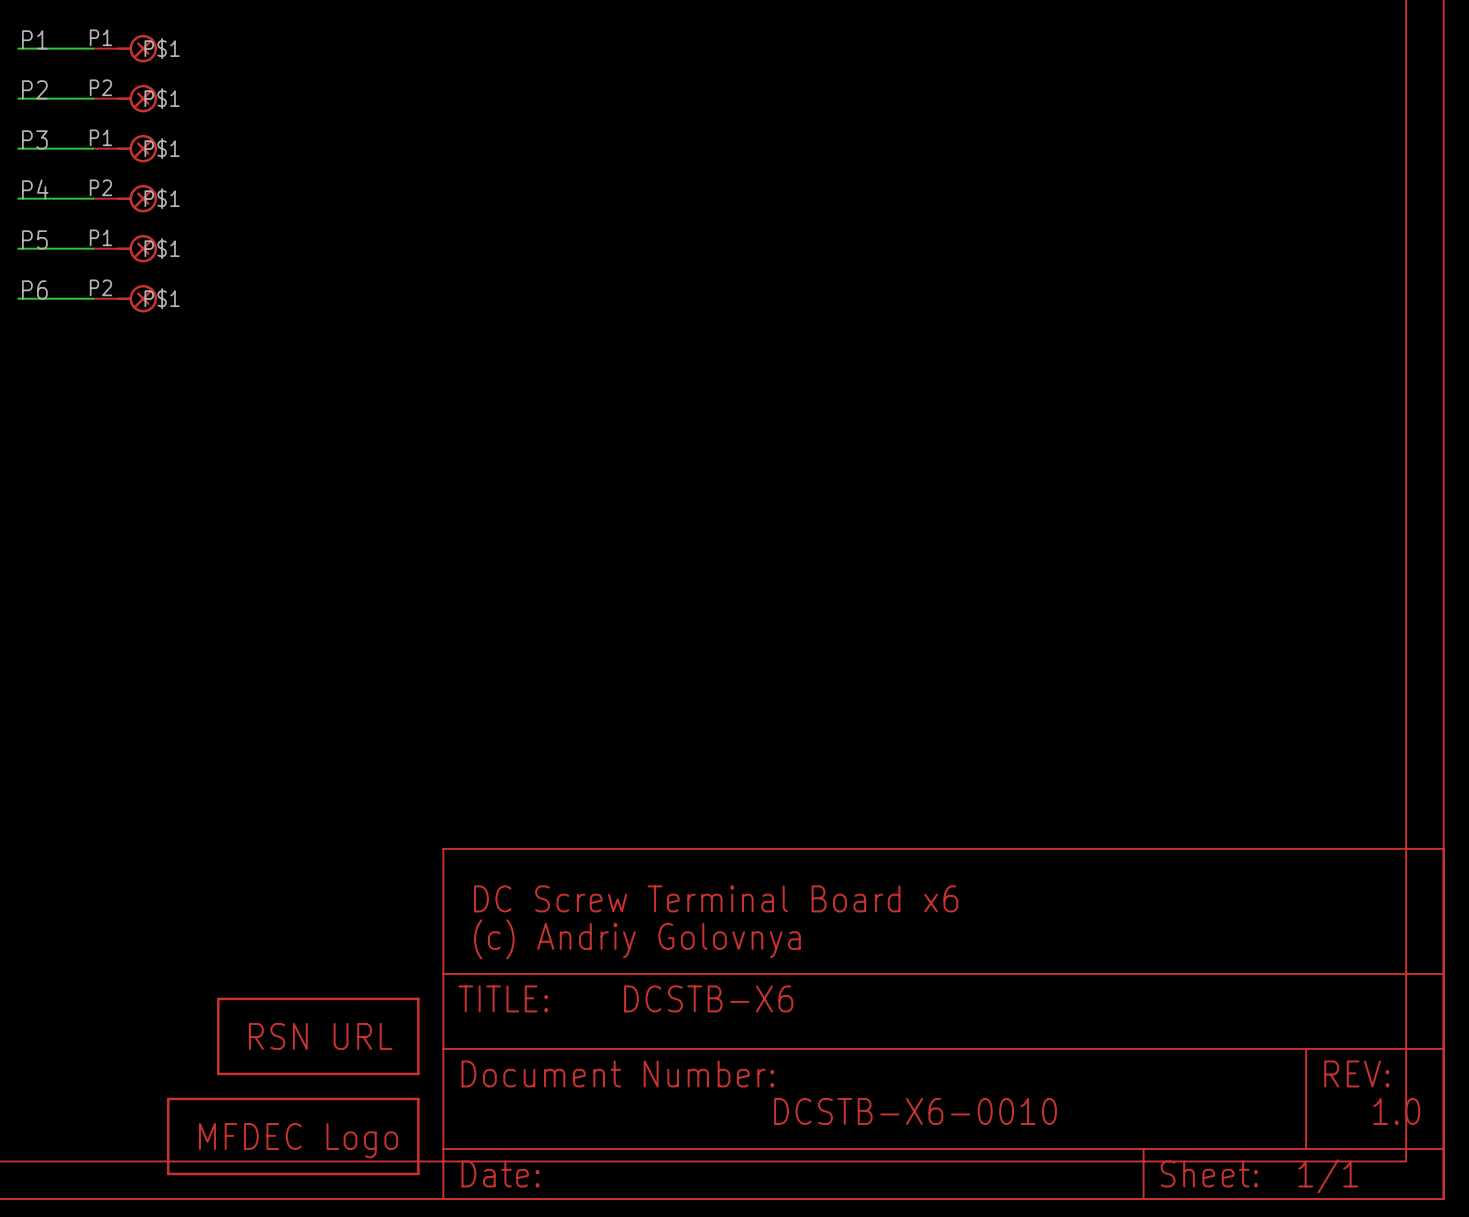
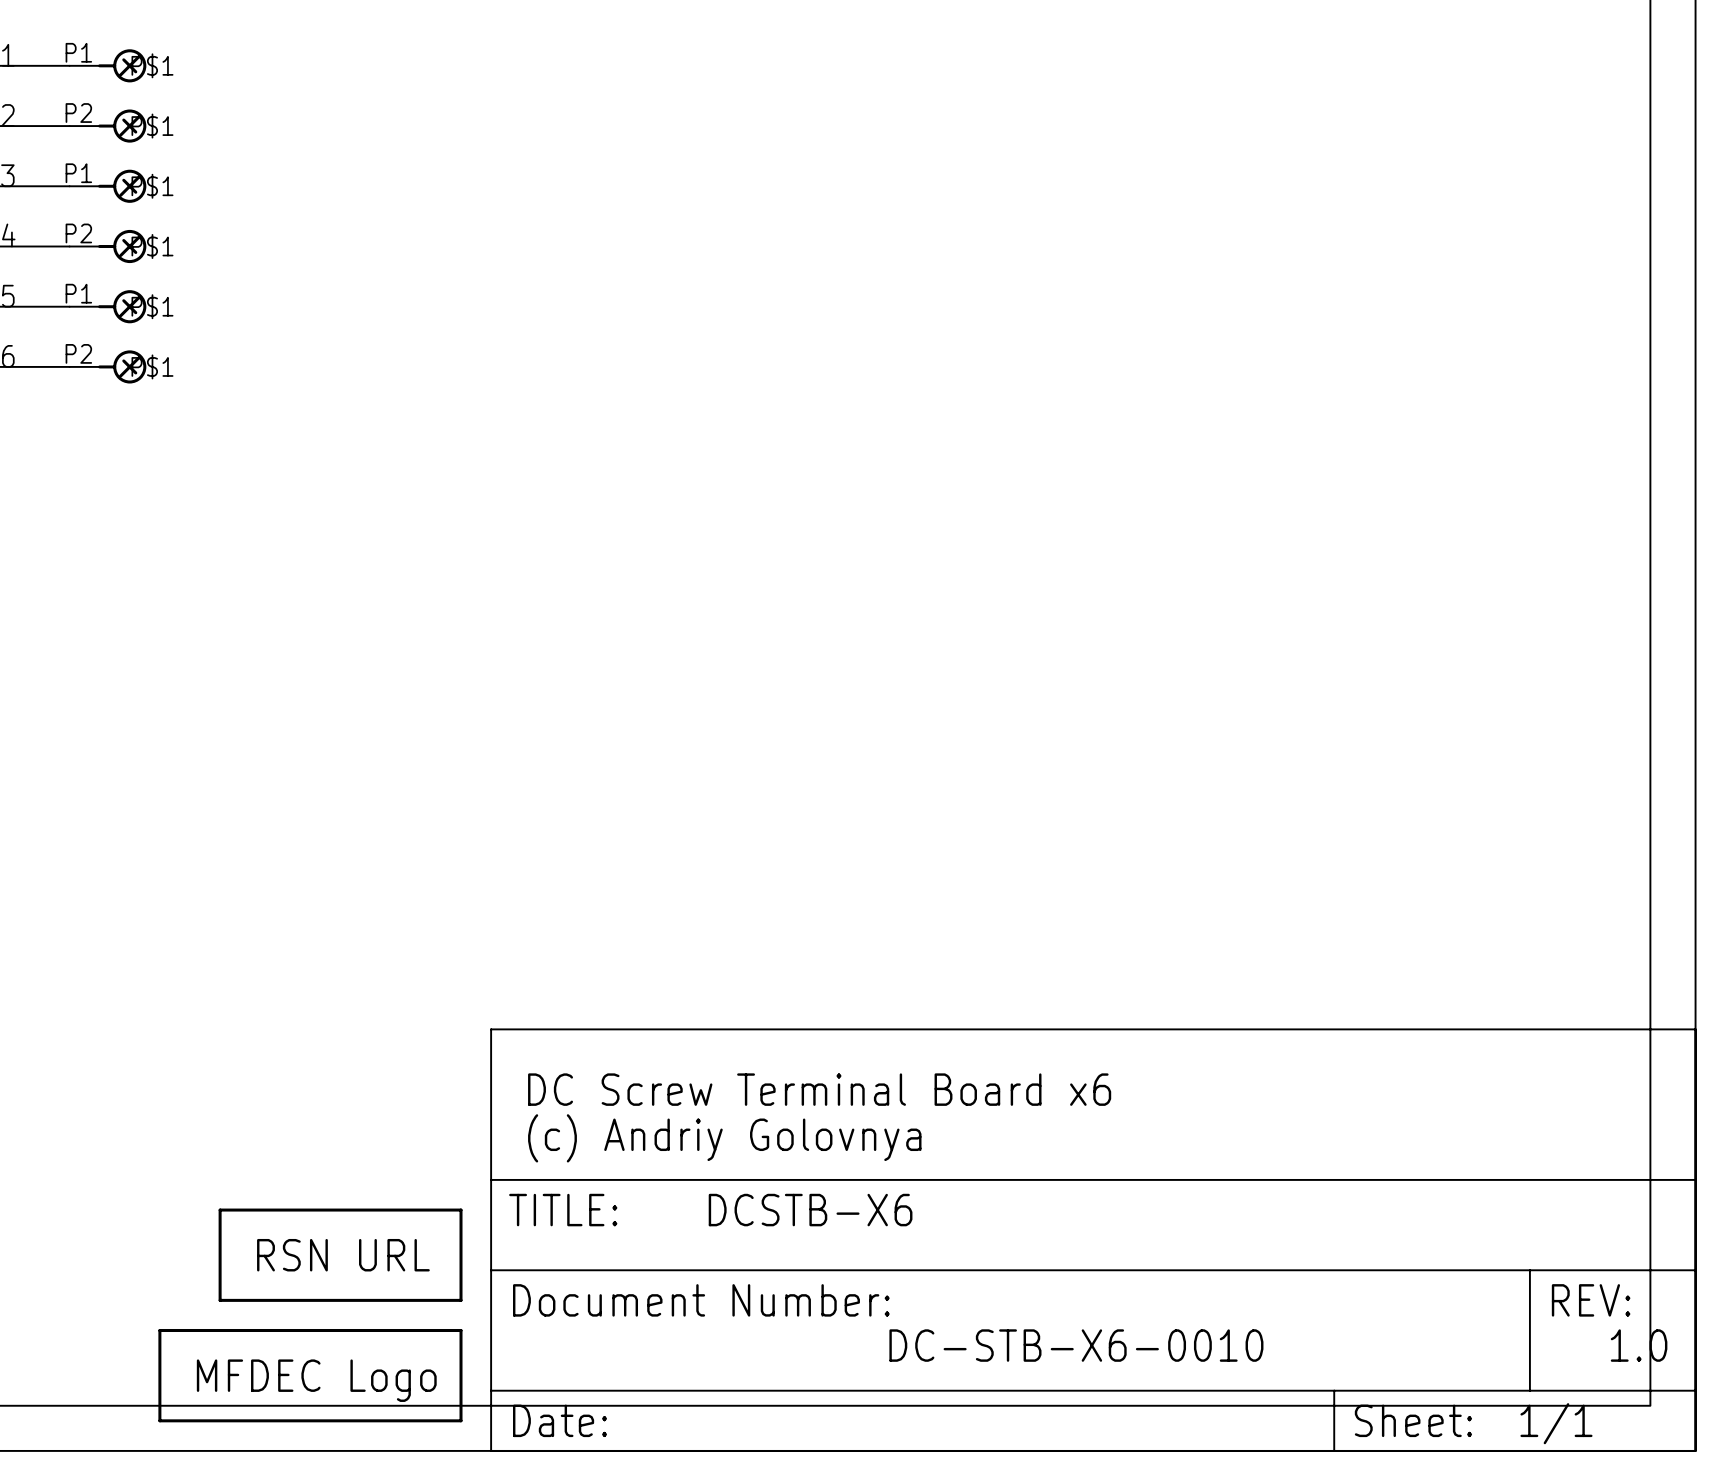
text: DCSTB-X6-0010 (915, 1111) -> DC-STB-X6-0010 (1076, 1345)

